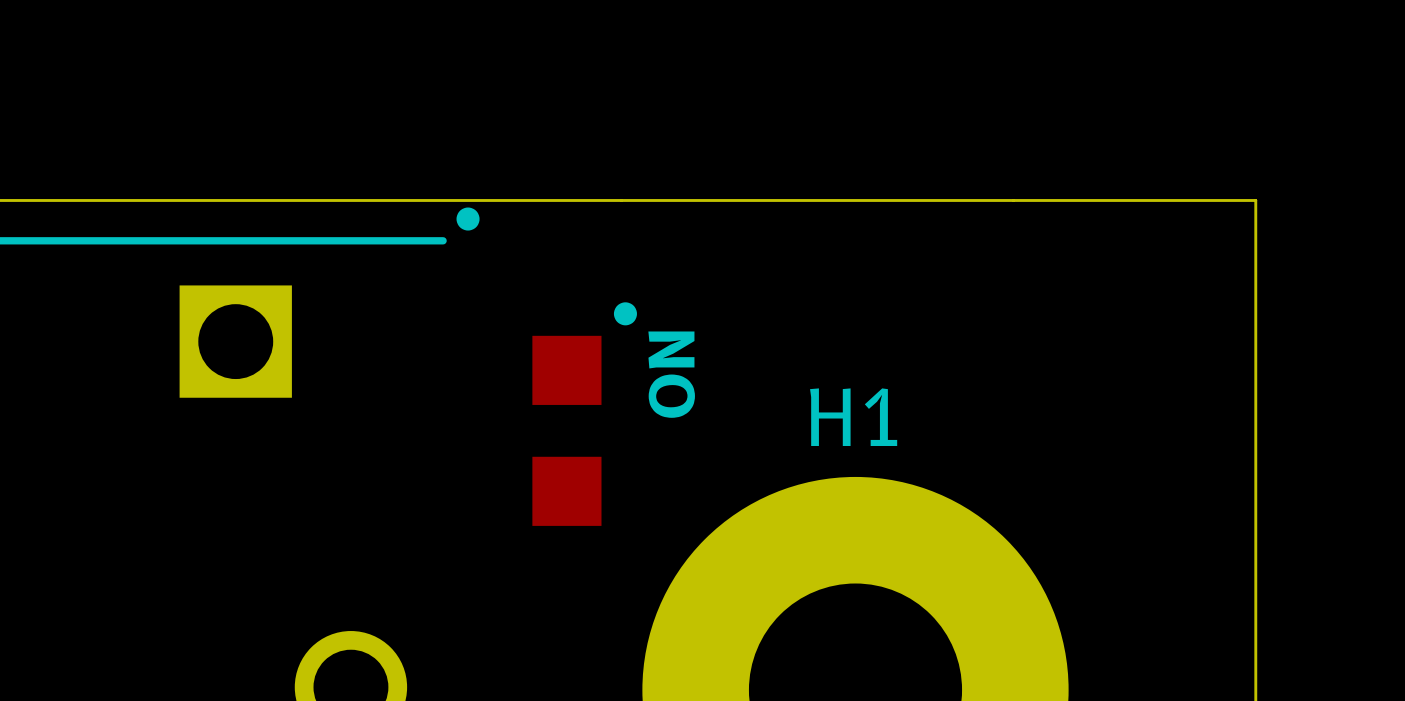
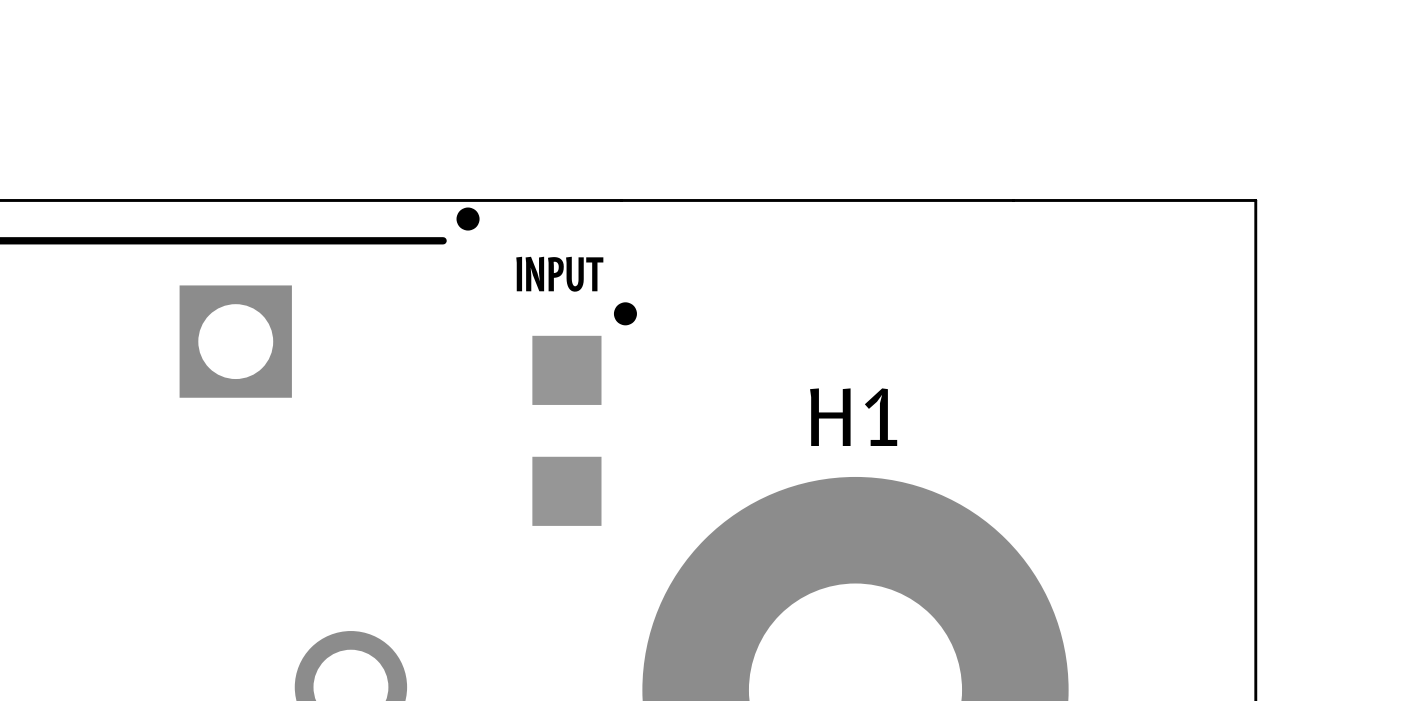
text: none -> INPUT (559, 274)
text: ON (671, 374) -> none

